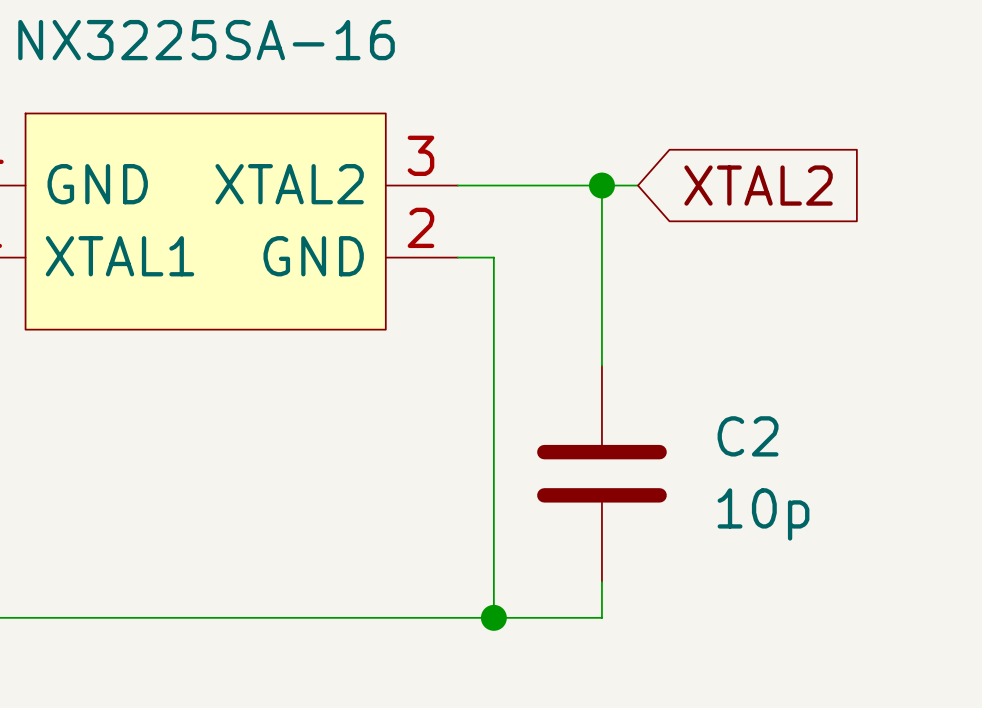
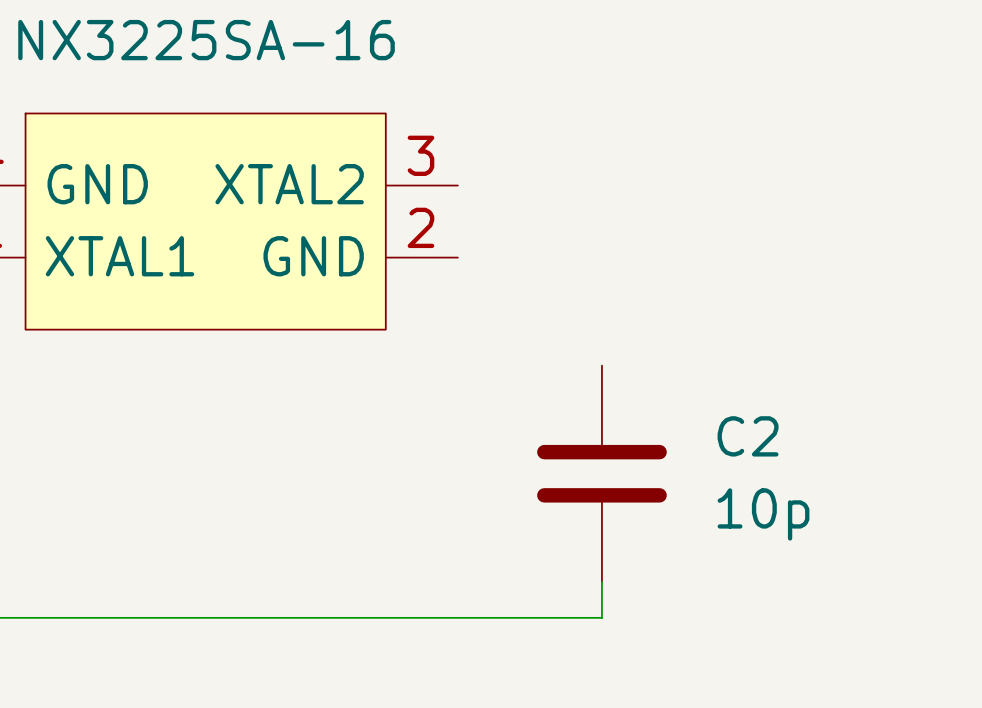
wire: (457, 185) (637, 185) -> none
wire: (601, 185) (601, 365) -> none
junction: (601, 185) -> none
global label: XTAL2 (758, 185) -> none
wire: (457, 257) (493, 257) (493, 617) -> none
junction: (493, 617) -> none

